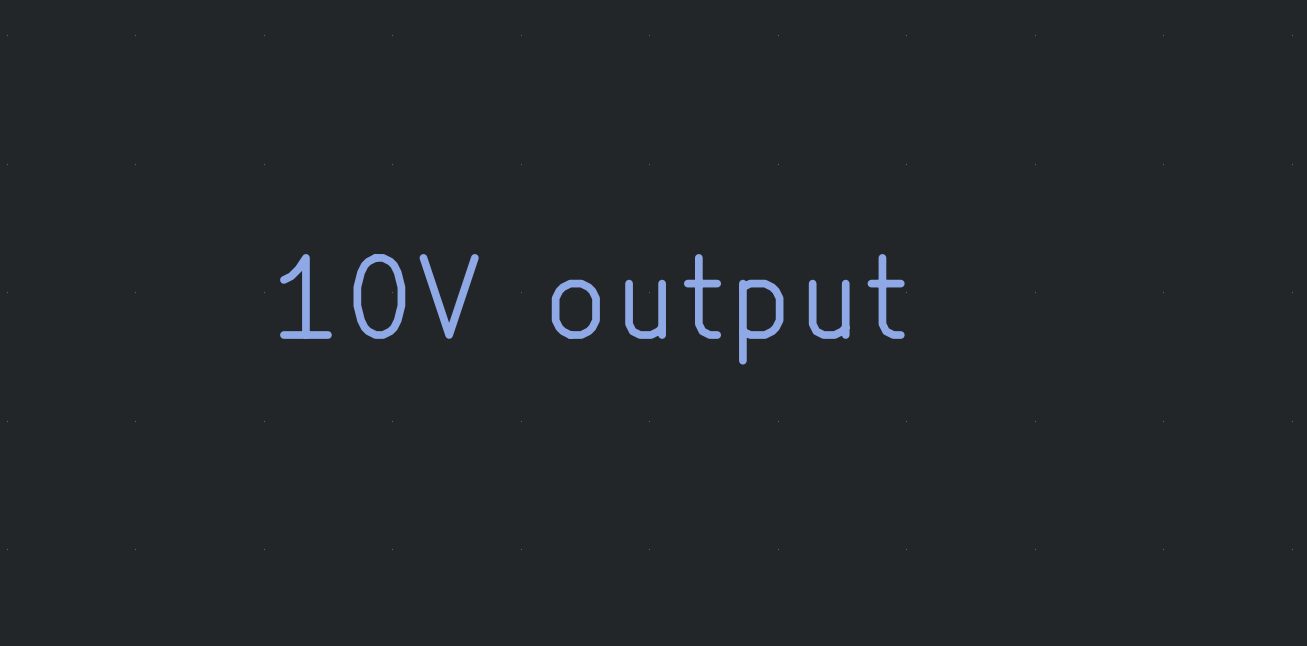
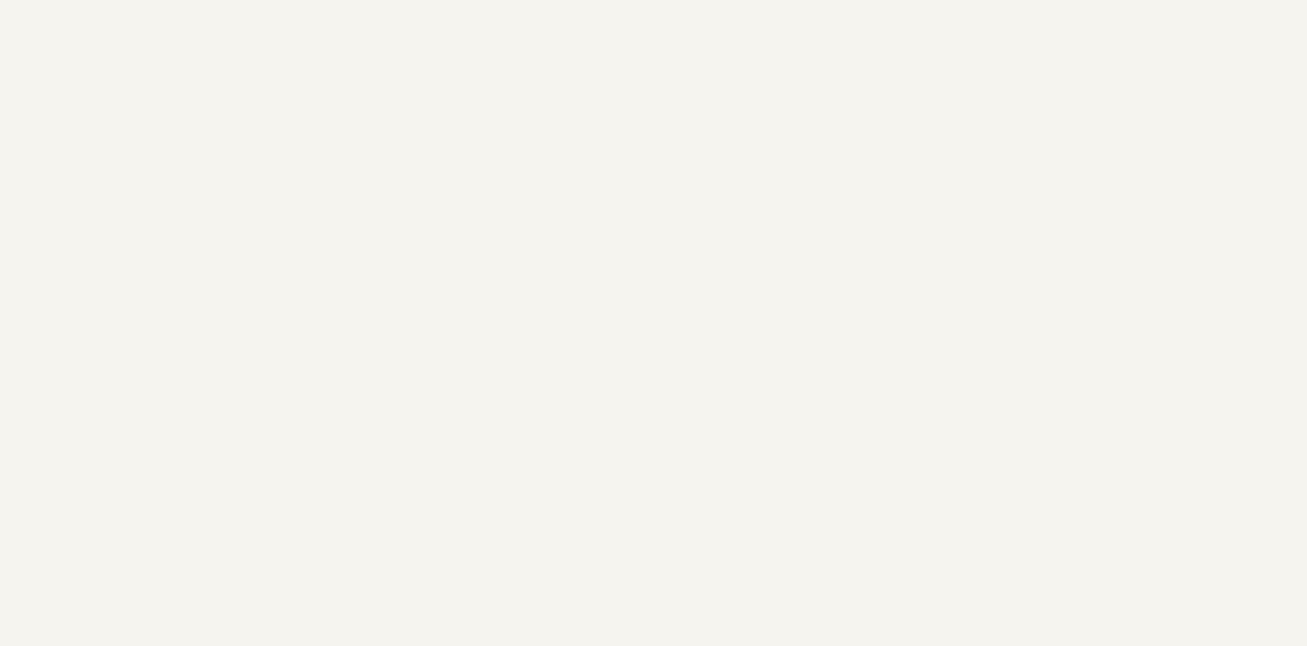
text: 10V output (592, 309) -> none

